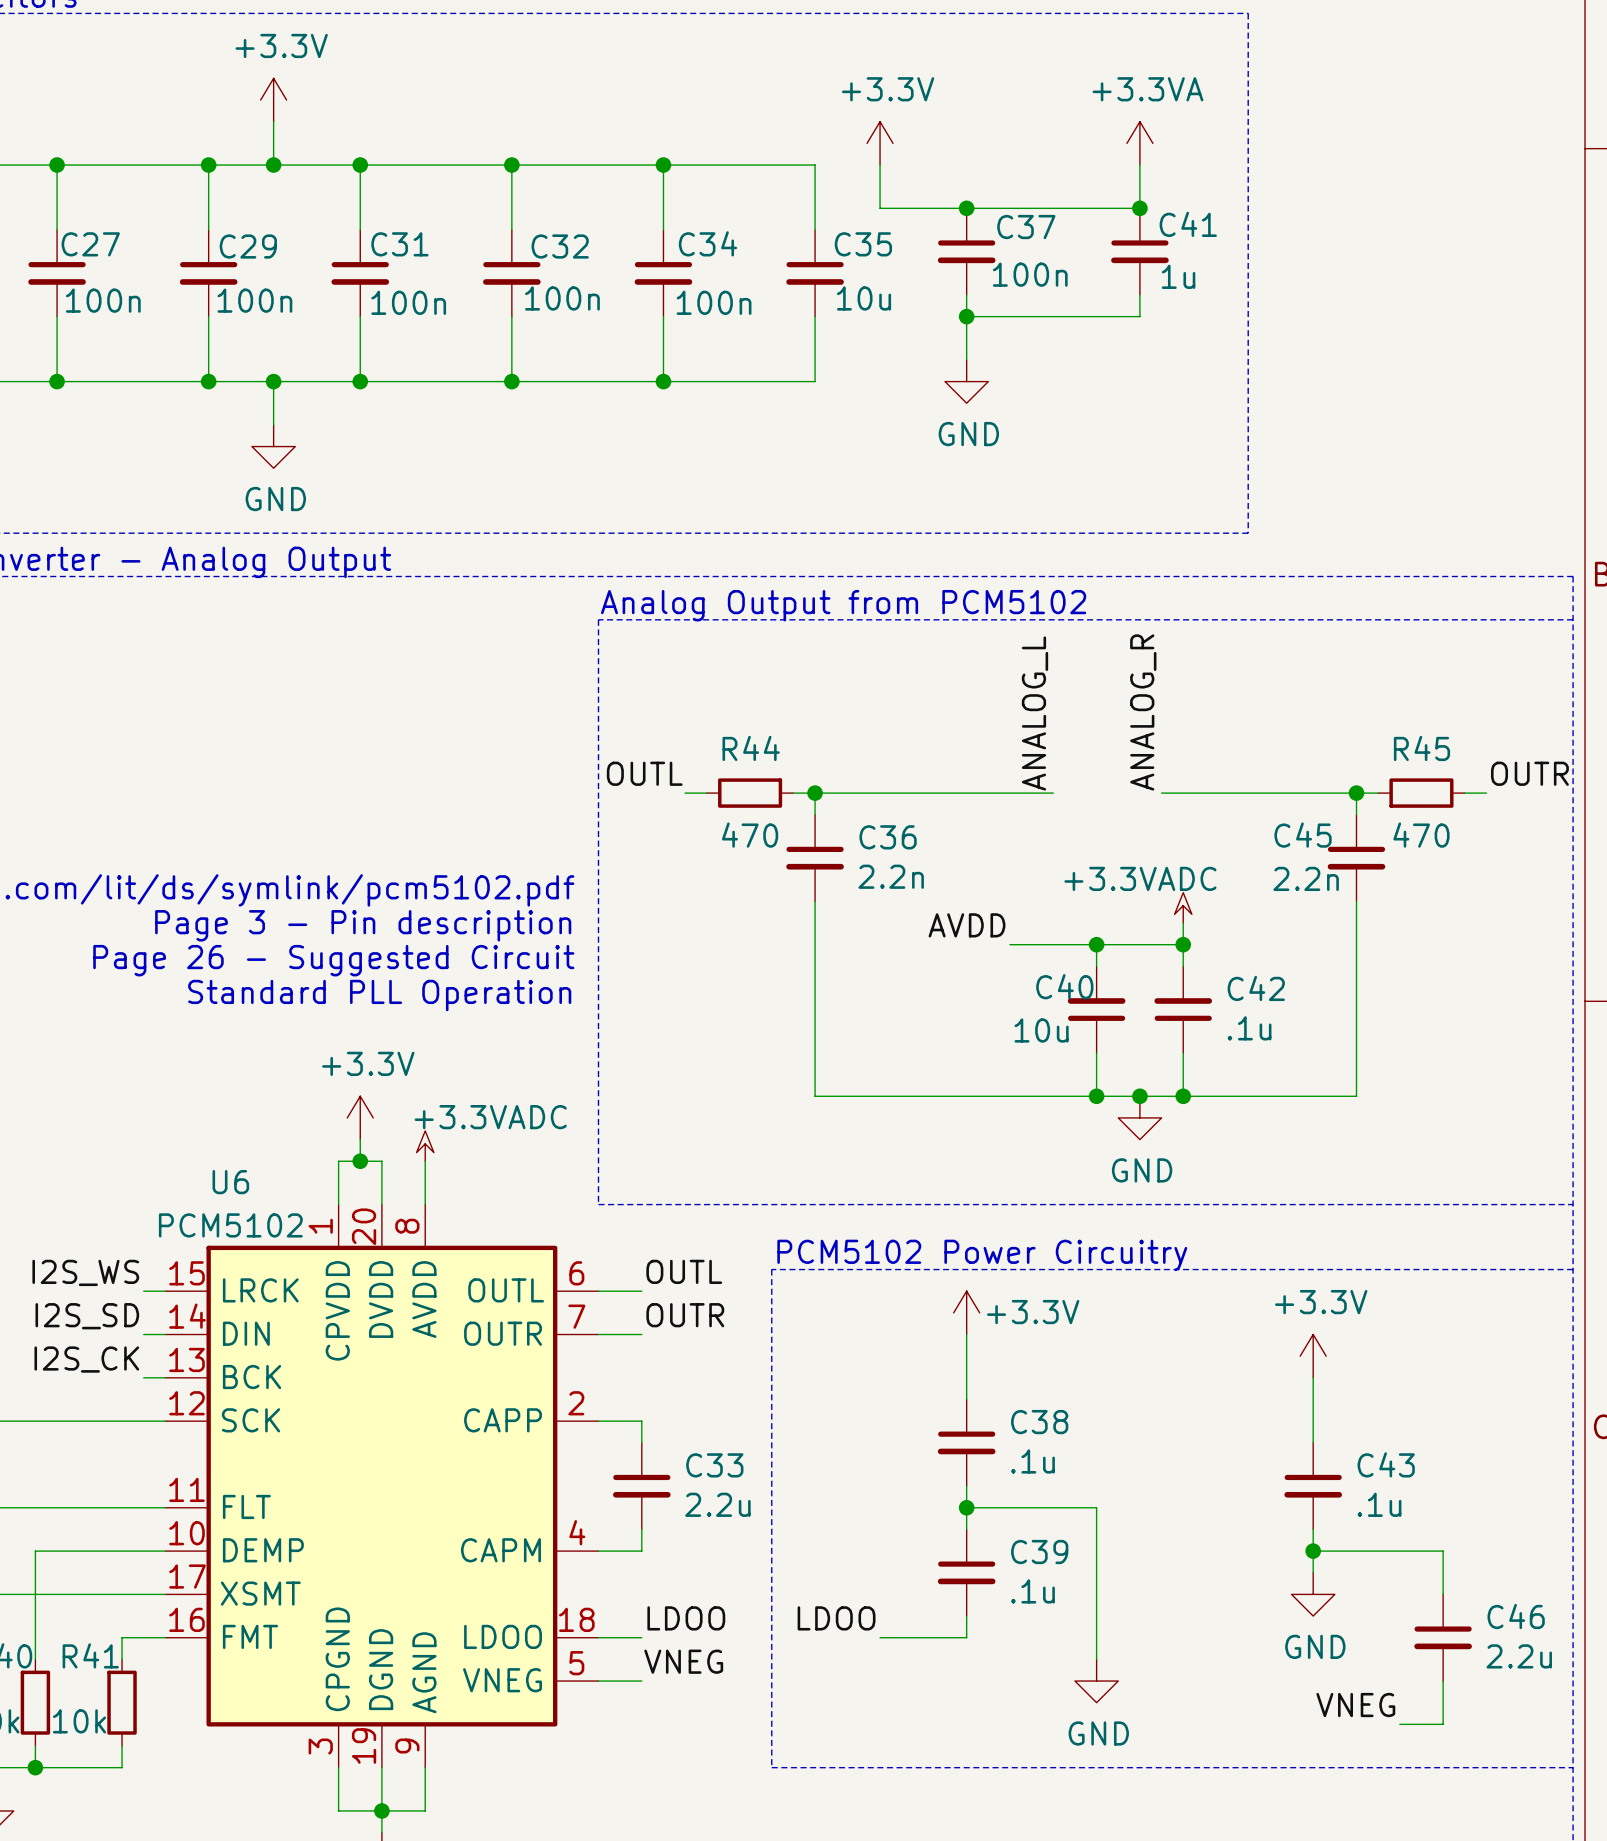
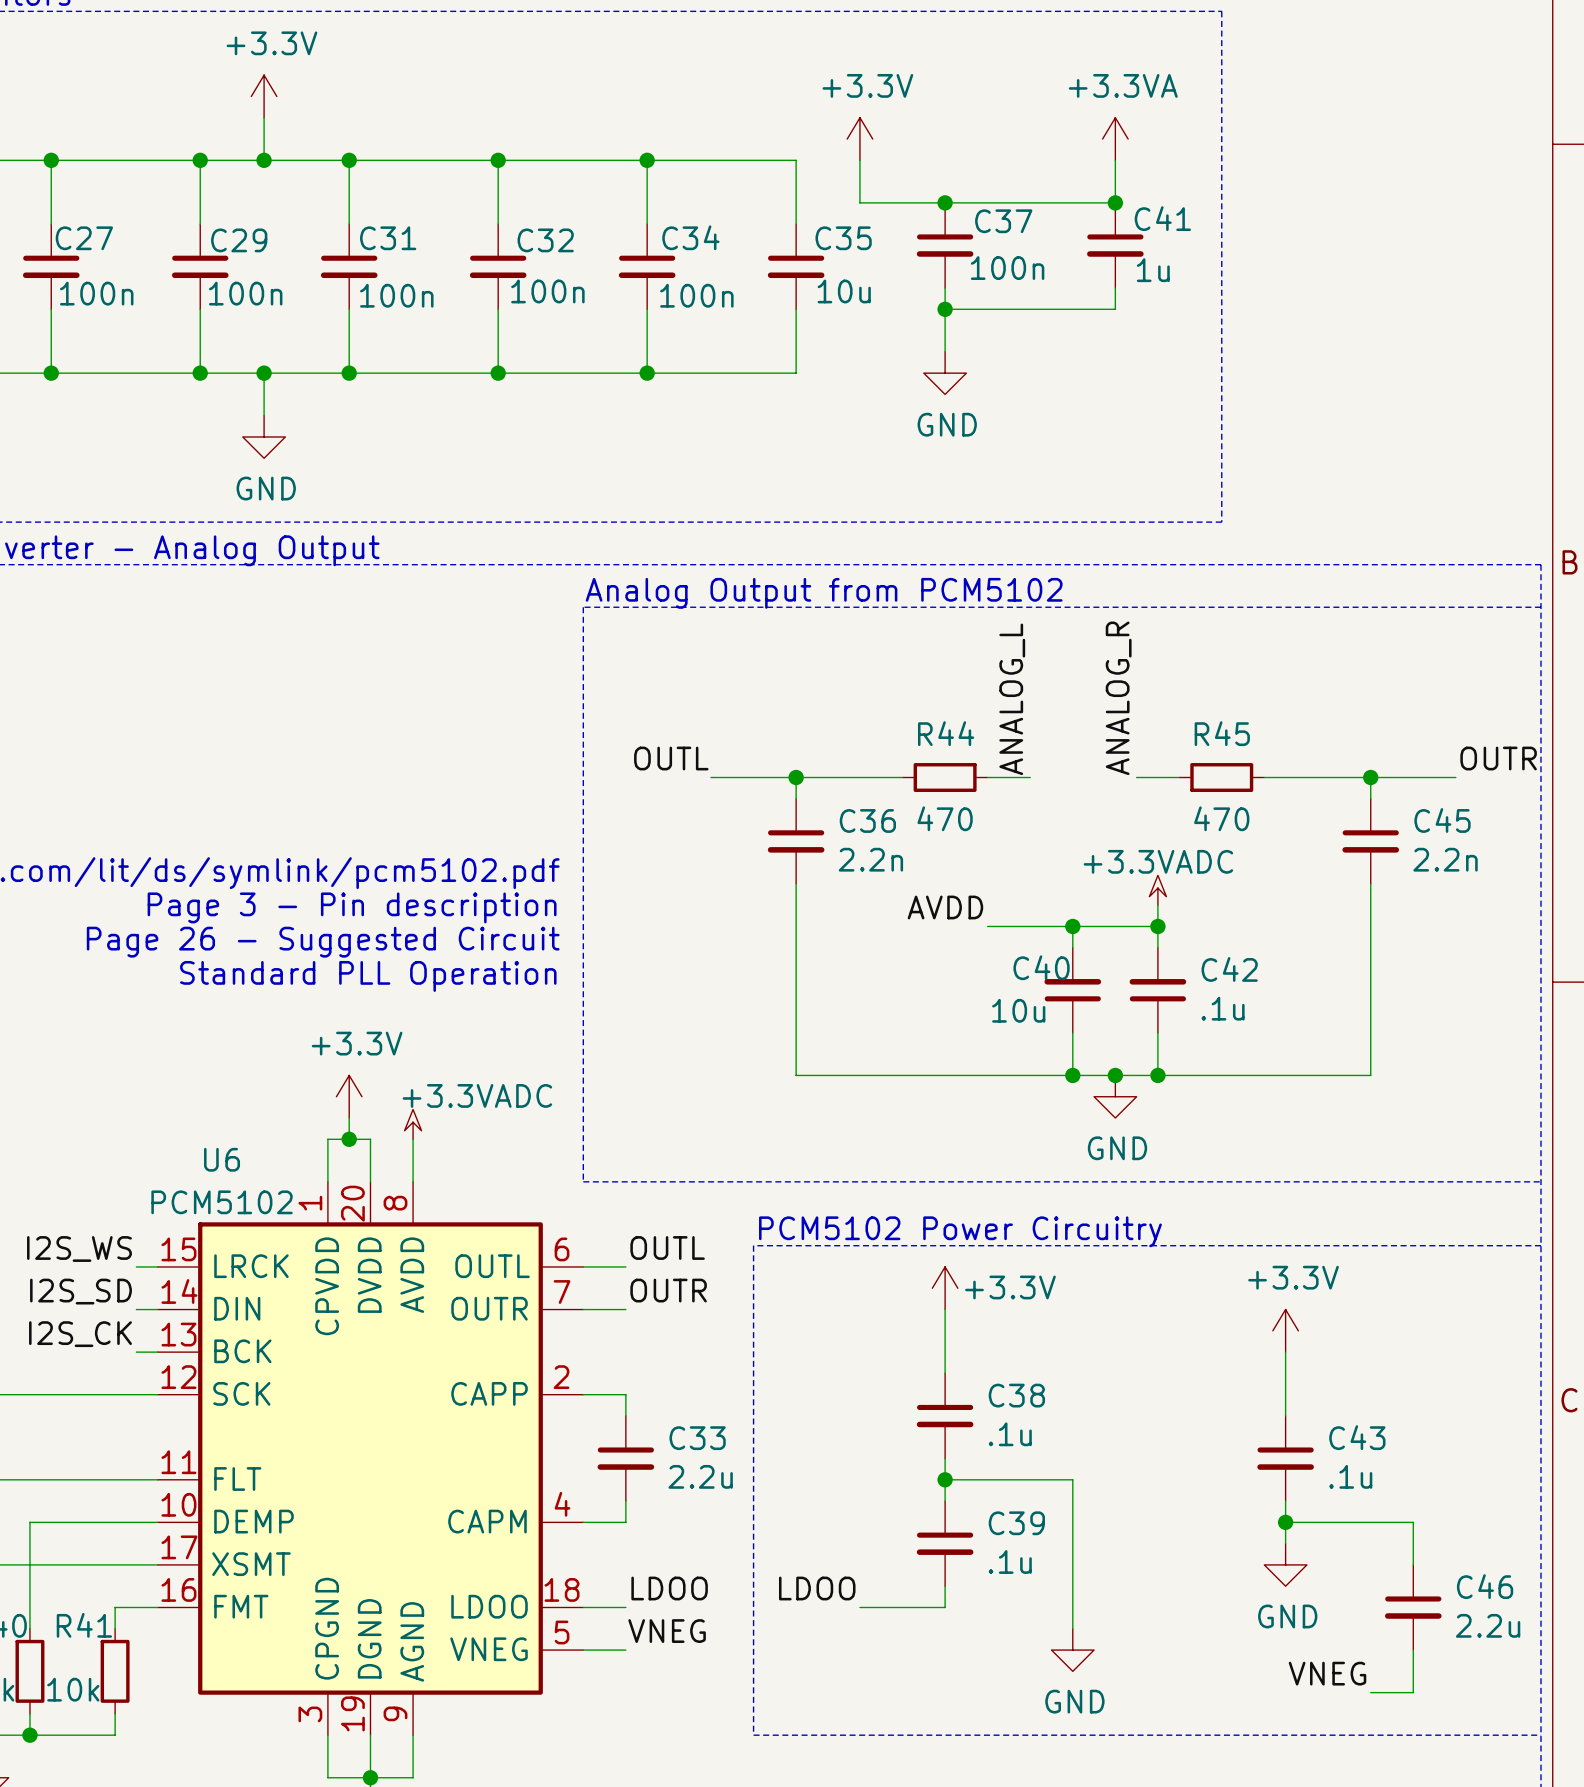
label position: OUTL (644, 773) -> OUTL (671, 758)
wire: (685, 793) (706, 793) -> none
wire: none -> (711, 777) (774, 777)
R44 position: (750, 793) -> (945, 777)
wire: (923, 793) (1009, 793) -> none
wire: (1204, 793) (1291, 793) -> (1349, 777) (1434, 777)
wire: (1356, 793) (1356, 814) -> (1370, 777) (1370, 798)
junction position: (1356, 793) -> (1370, 777)
R45 position: (1421, 793) -> (1221, 777)
C45 name position: C45 (1303, 835) -> C45 (1442, 820)
C45 position: (1356, 858) -> (1370, 841)
power symbol text position: +3.3VADC (1140, 878) -> +3.3VADC (1158, 861)
C45 value position: 2.2n (1306, 878) -> 2.2n (1445, 859)
wire: (1356, 901) (1356, 1096) -> (1370, 883) (1370, 1075) (1328, 1075)

